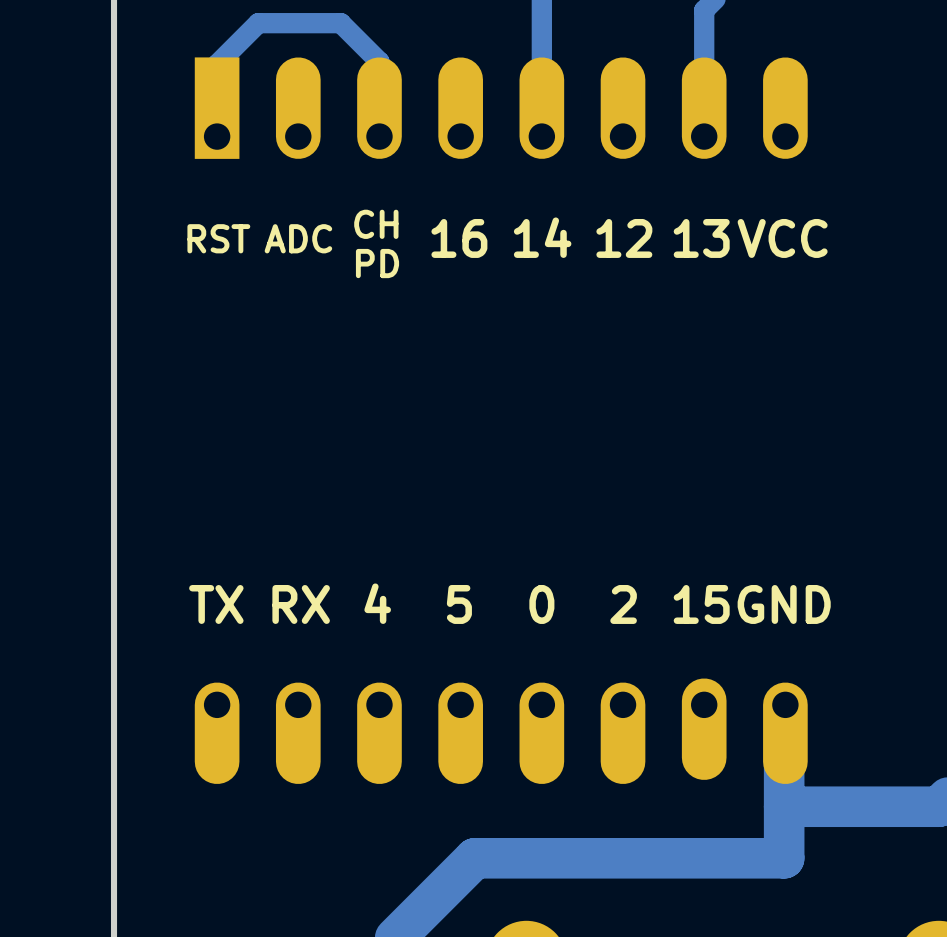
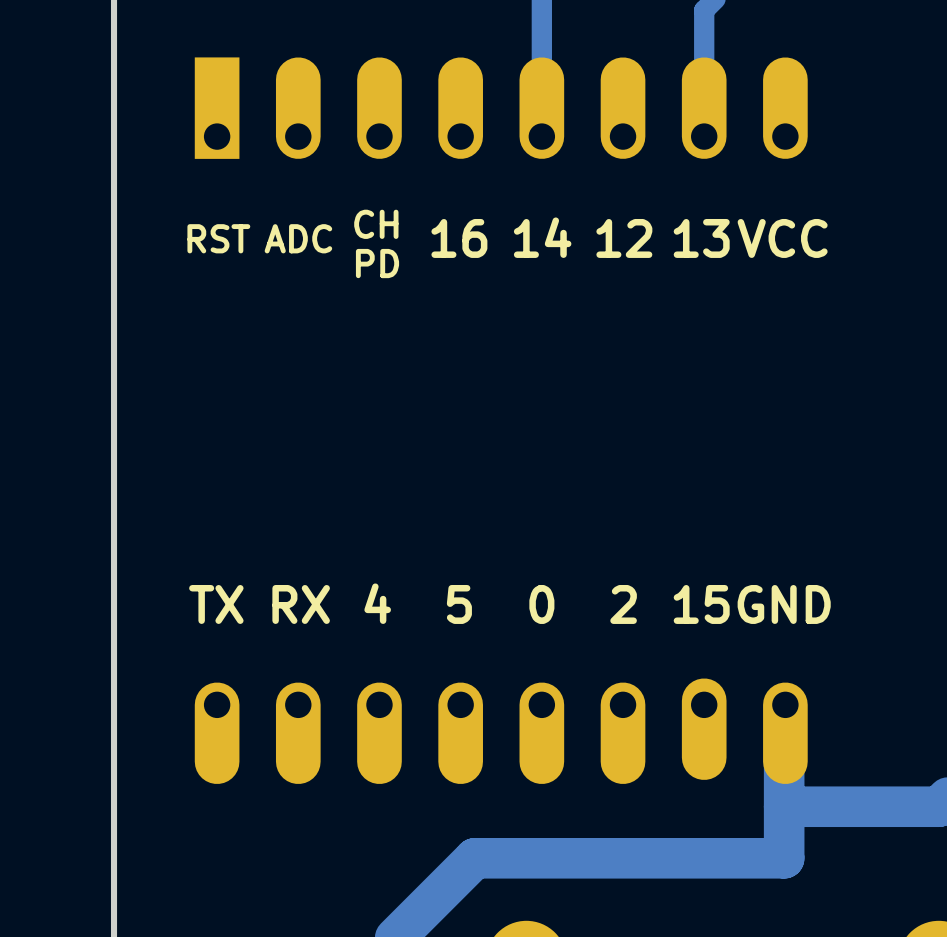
track: (379, 136) (379, 61) (340, 23) (258, 23) (217, 64) (217, 136) -> none

